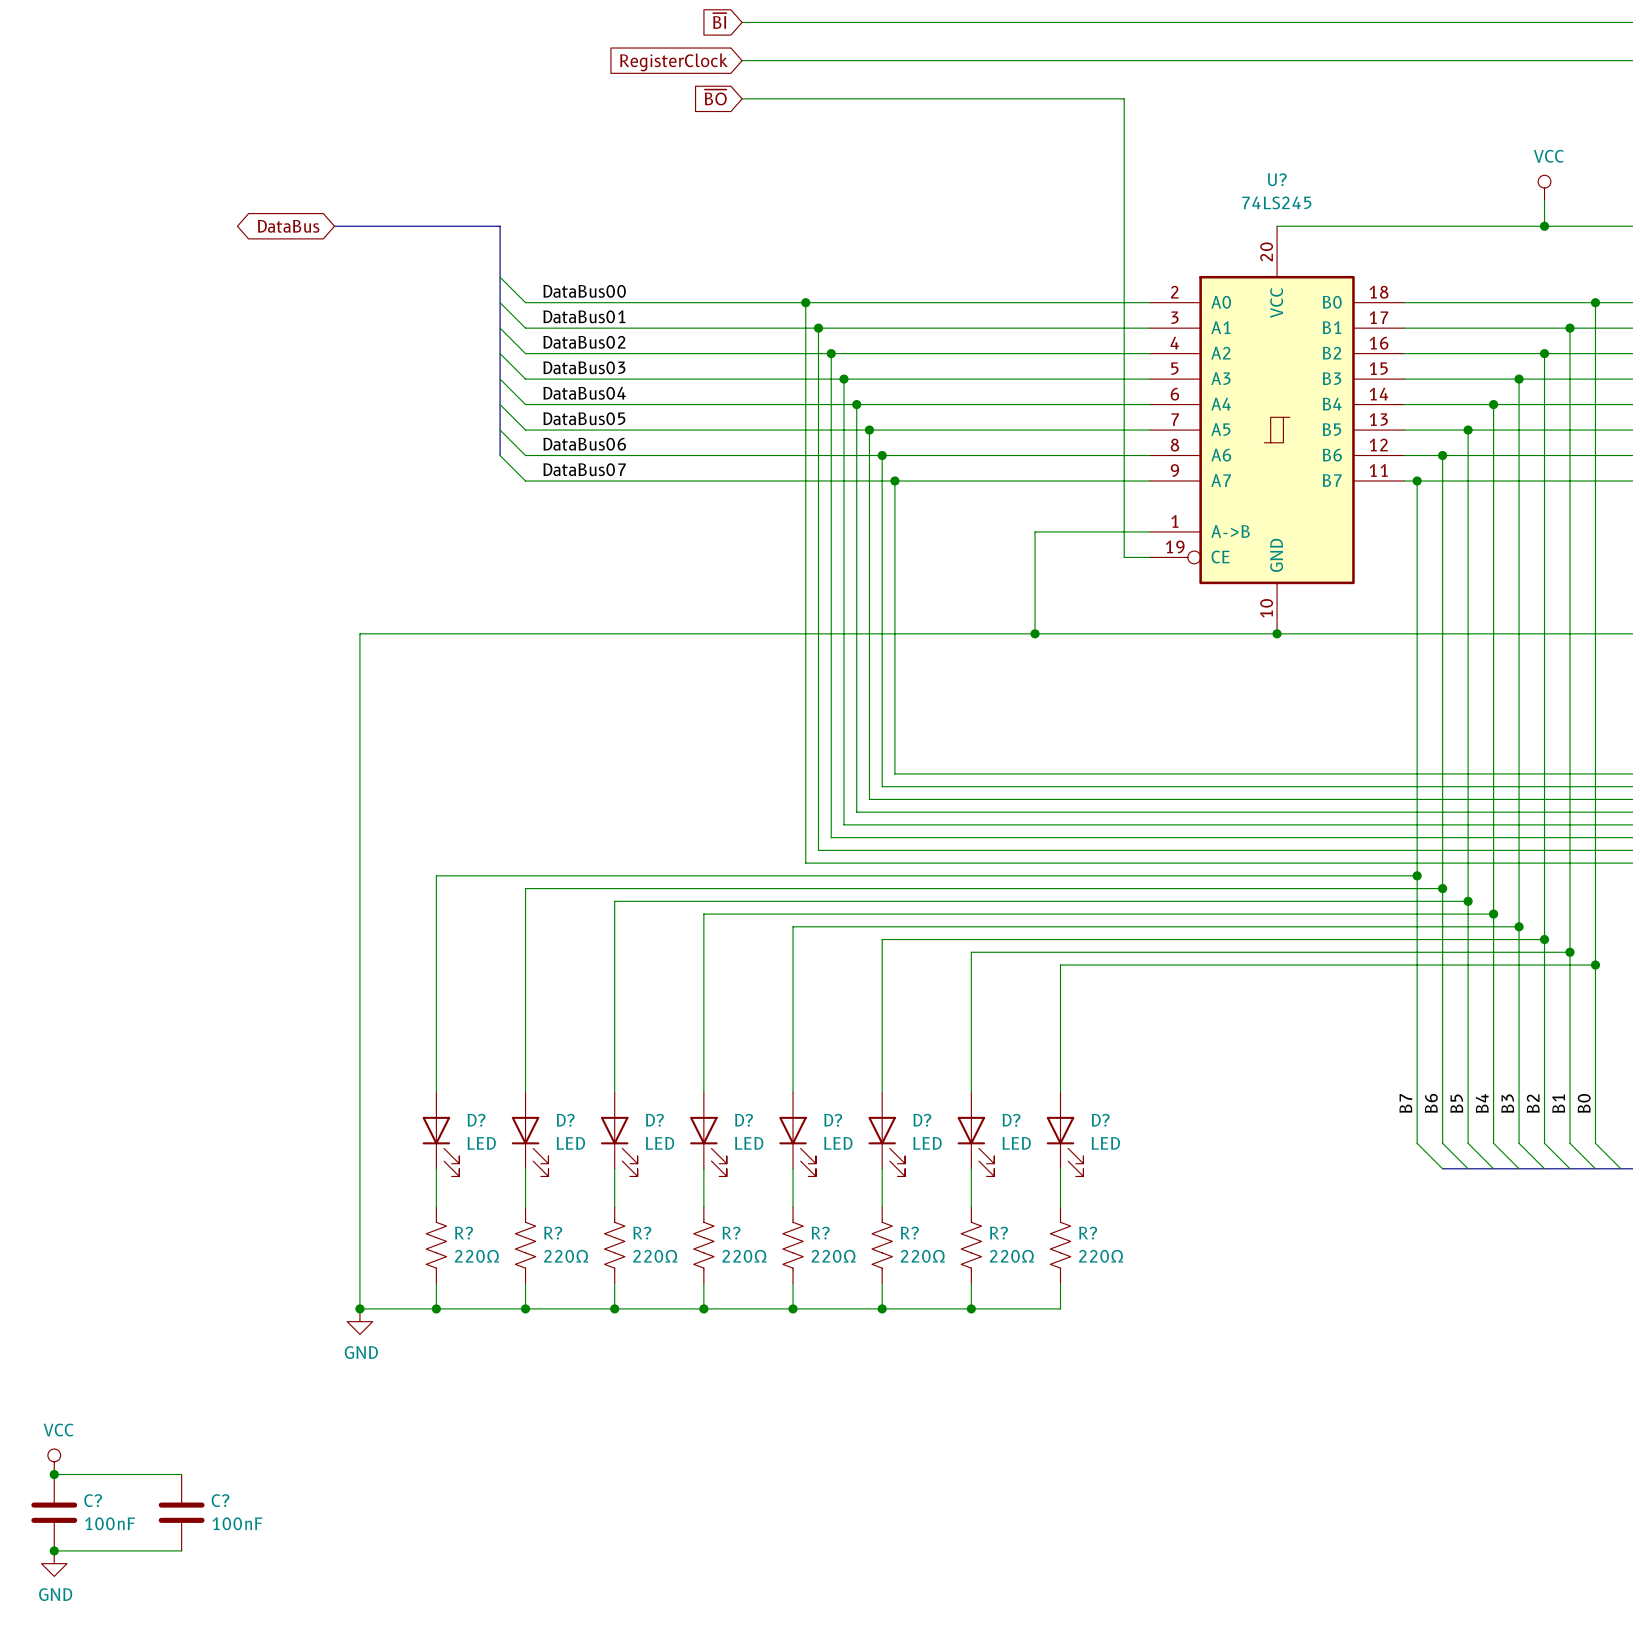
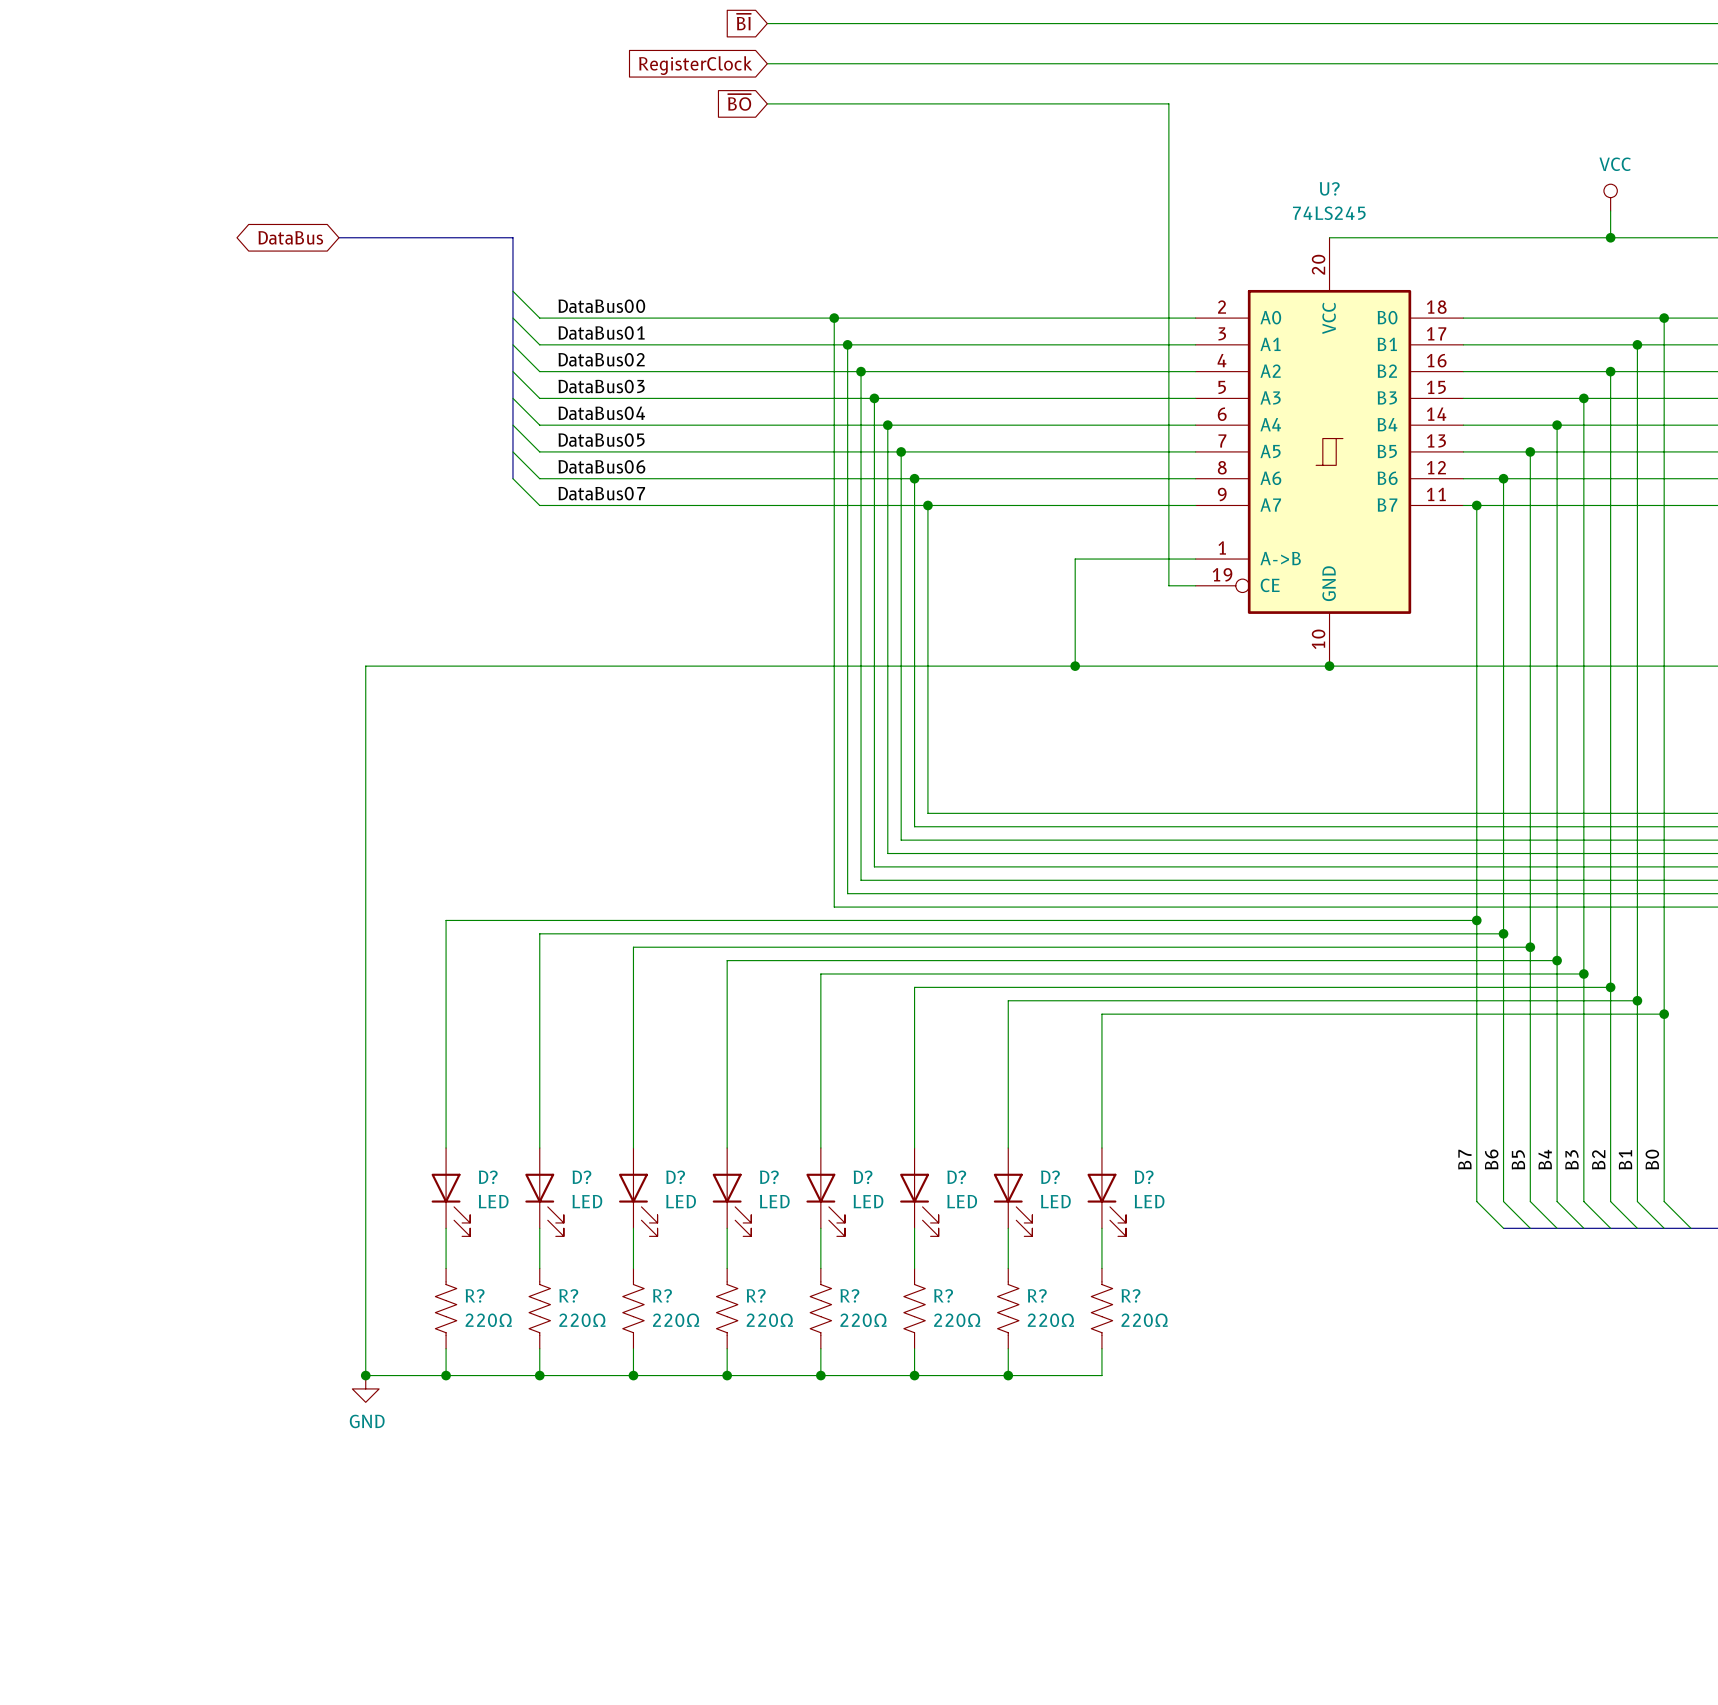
power symbol: VCC (54, 1461) -> none
wire: (54, 1474) (181, 1474) -> none
junction: (54, 1474) -> none
C?: 100nF (54, 1512) -> none
C?: 100nF (181, 1512) -> none
wire: (54, 1550) (181, 1550) -> none
junction: (54, 1550) -> none
power symbol: GND (54, 1563) -> none

